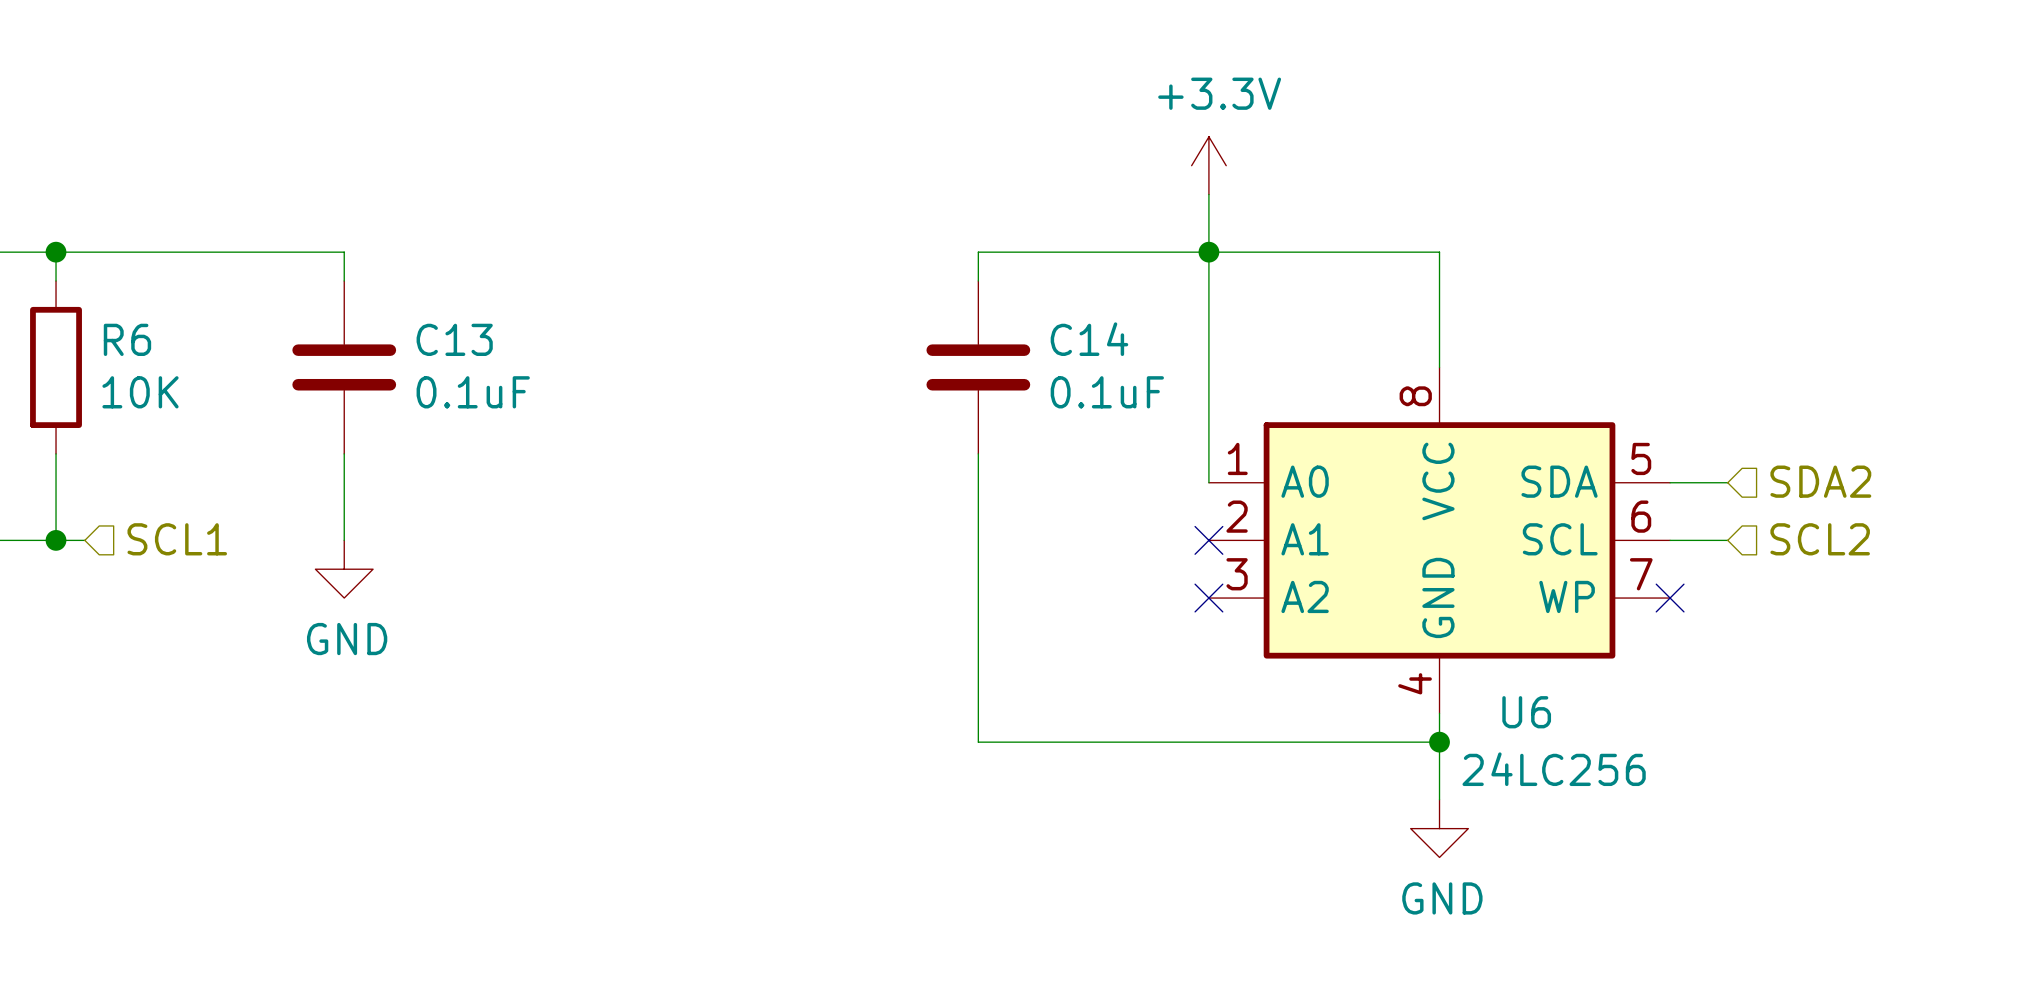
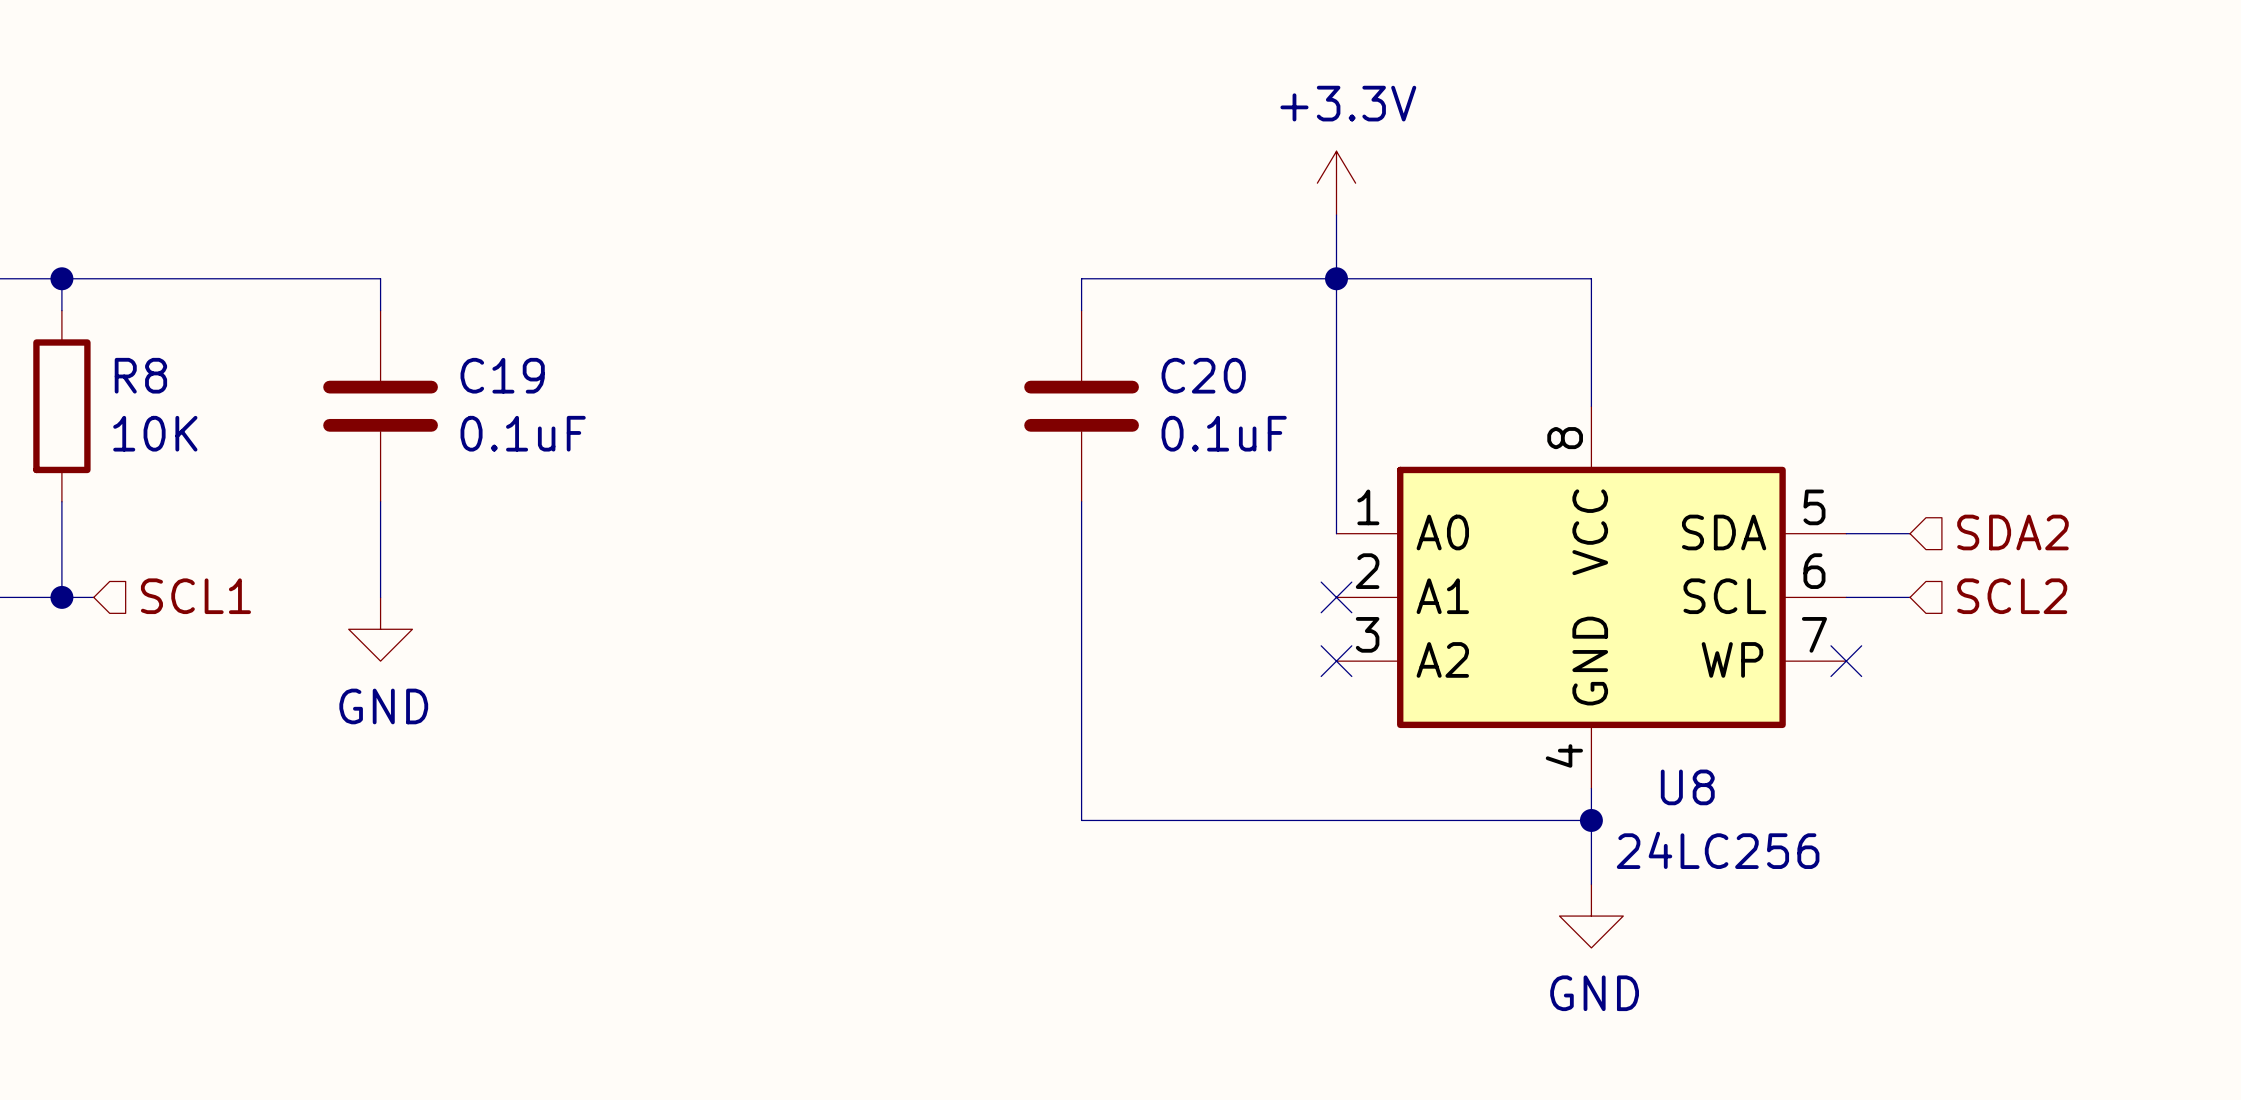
R6 name: R6 (127, 339) -> R8 (140, 375)
C13 name: C13 (454, 339) -> C19 (502, 375)
C14 name: C14 (1089, 339) -> C20 (1203, 375)
U6 name: U6 (1526, 712) -> U8 (1687, 787)

